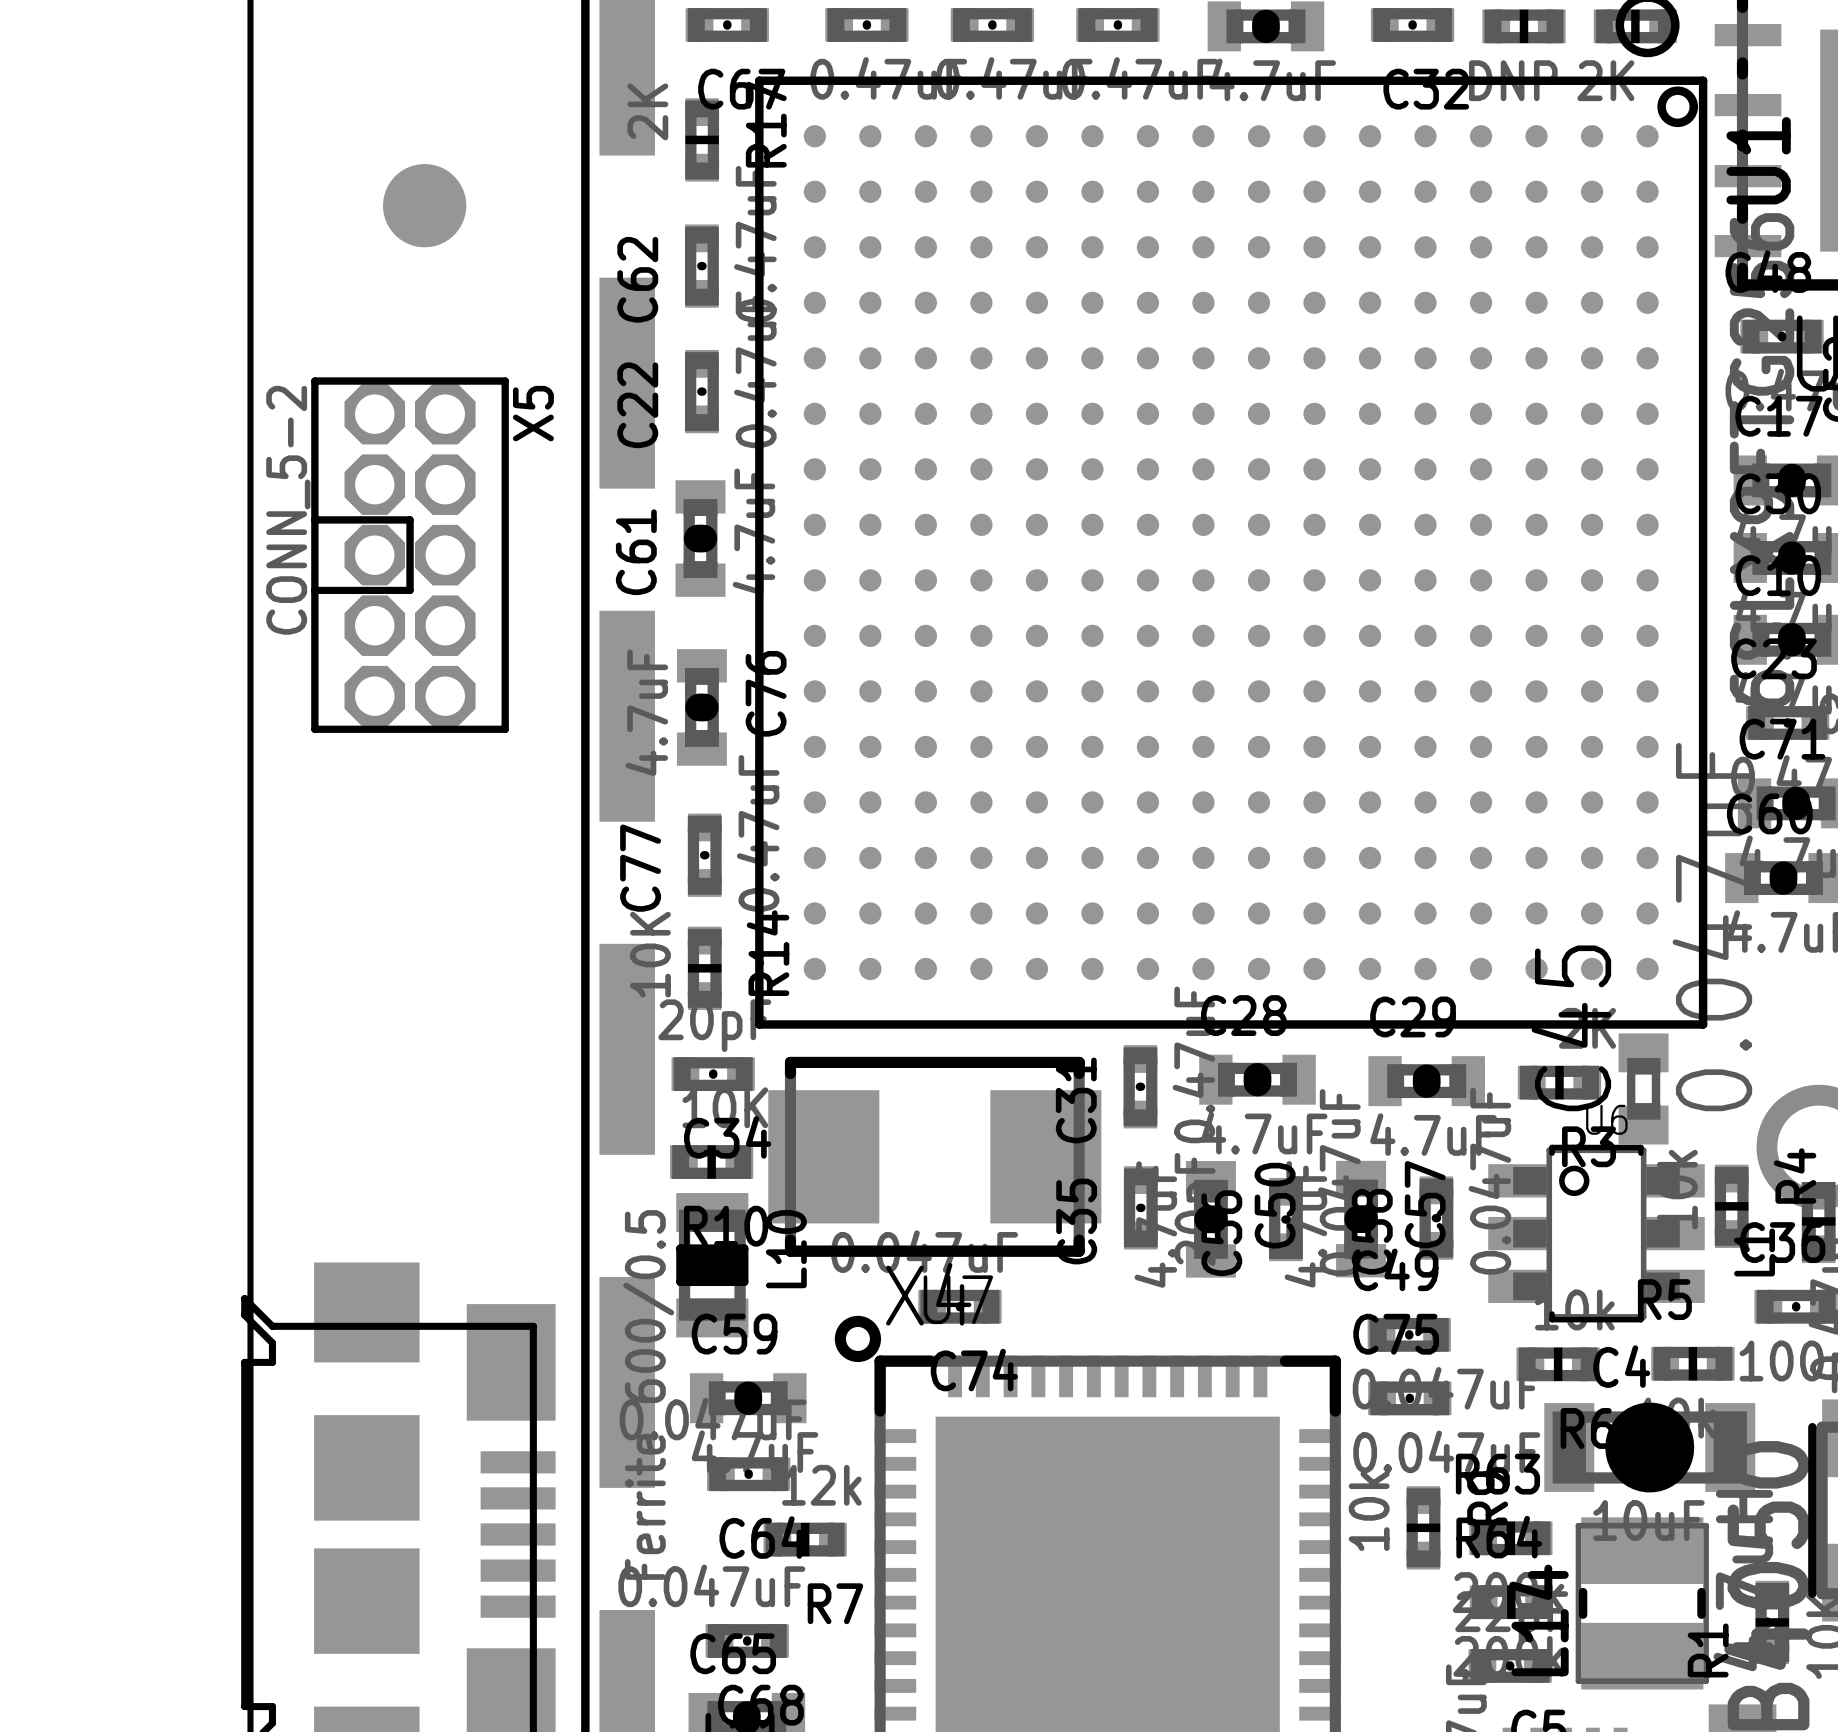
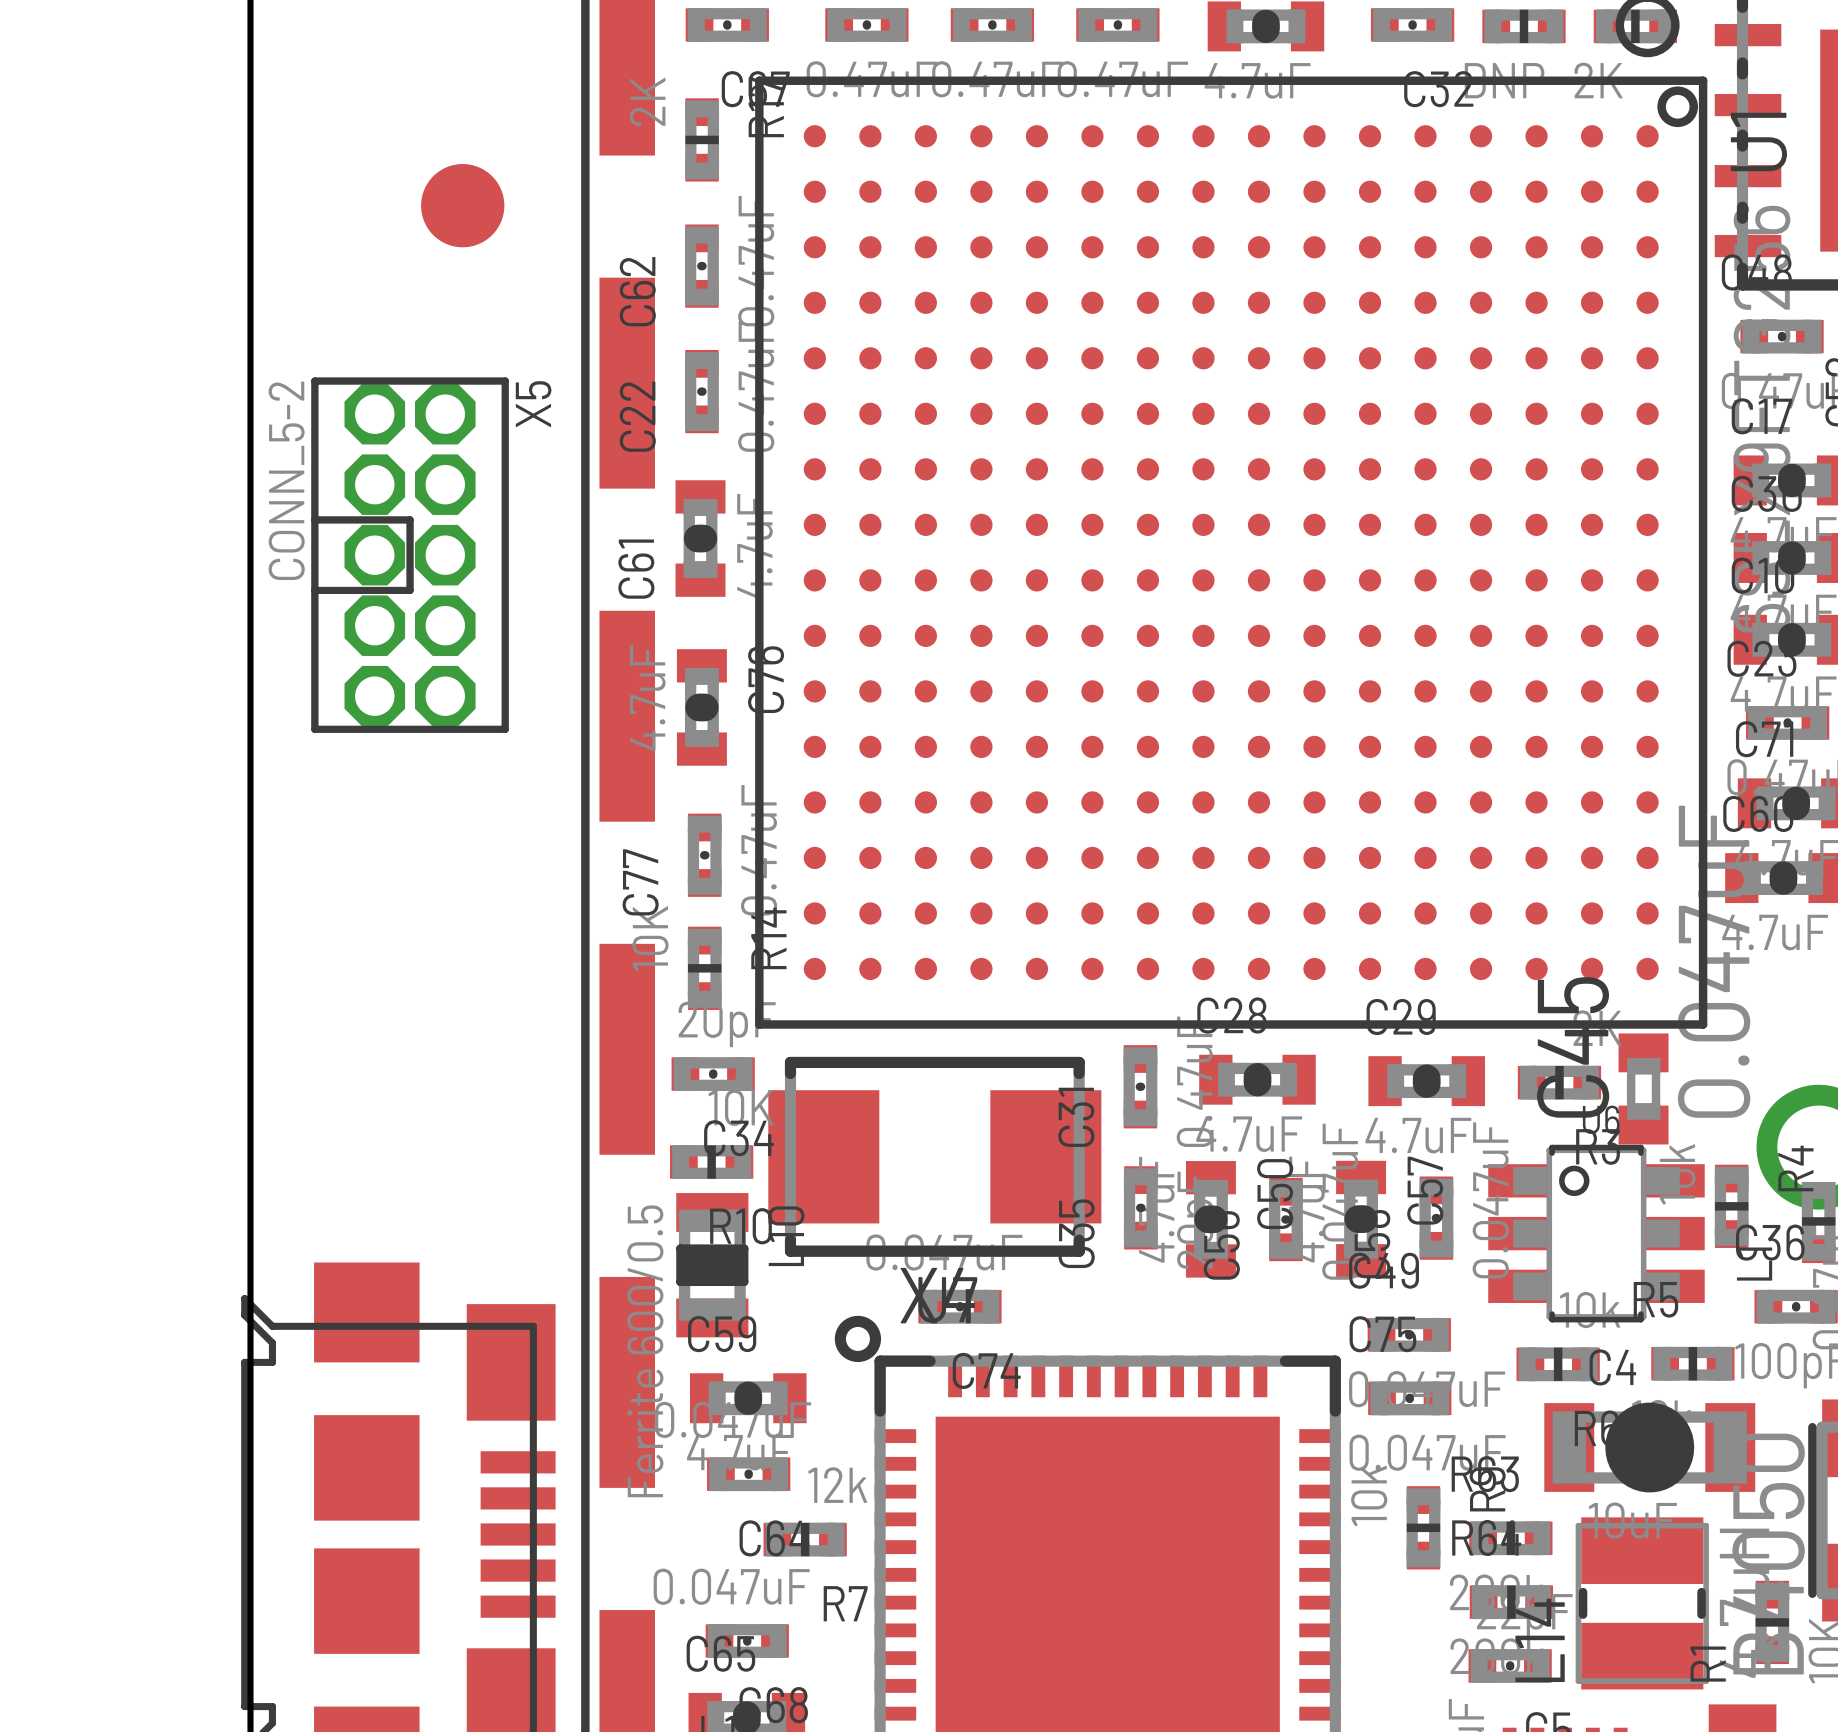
part position: (424, 205) -> (462, 205)

